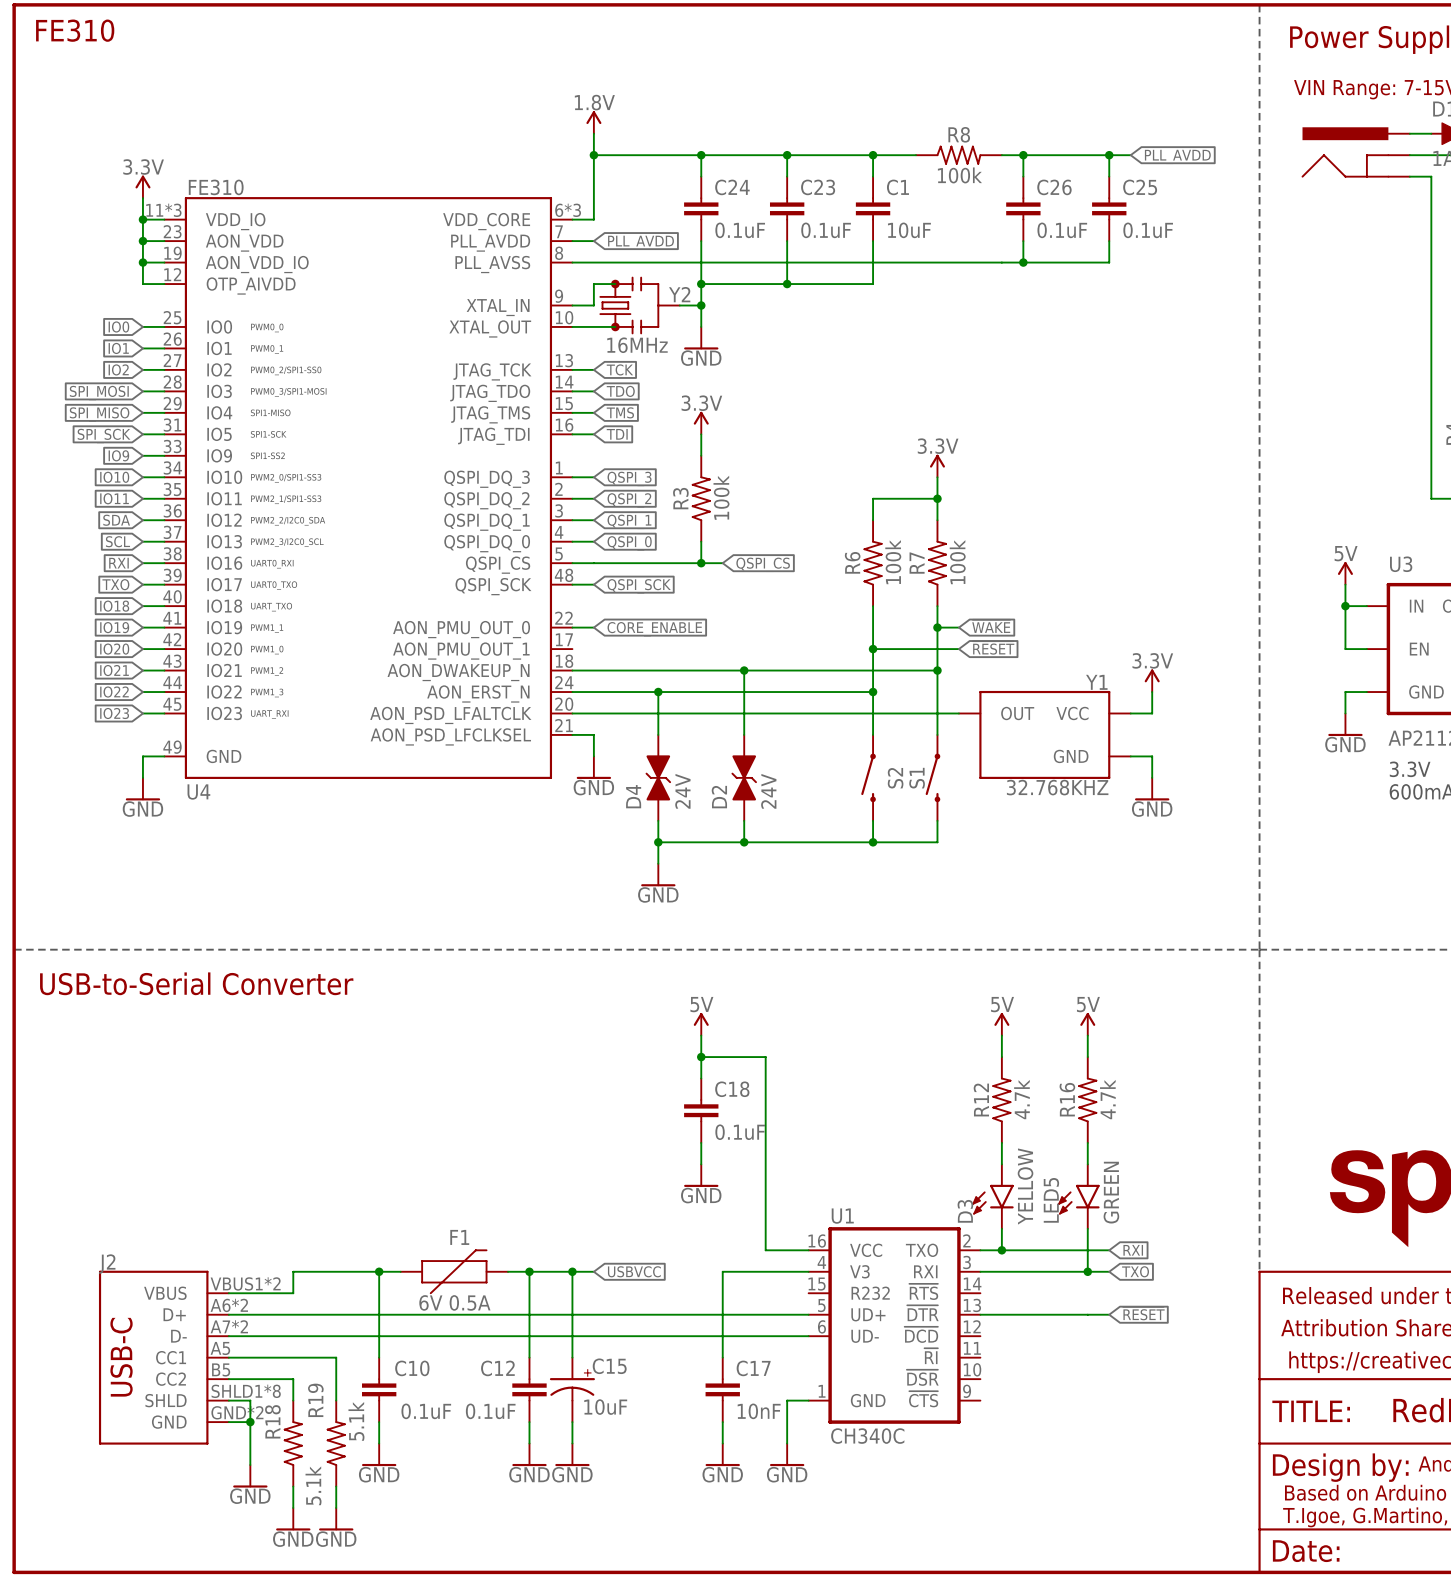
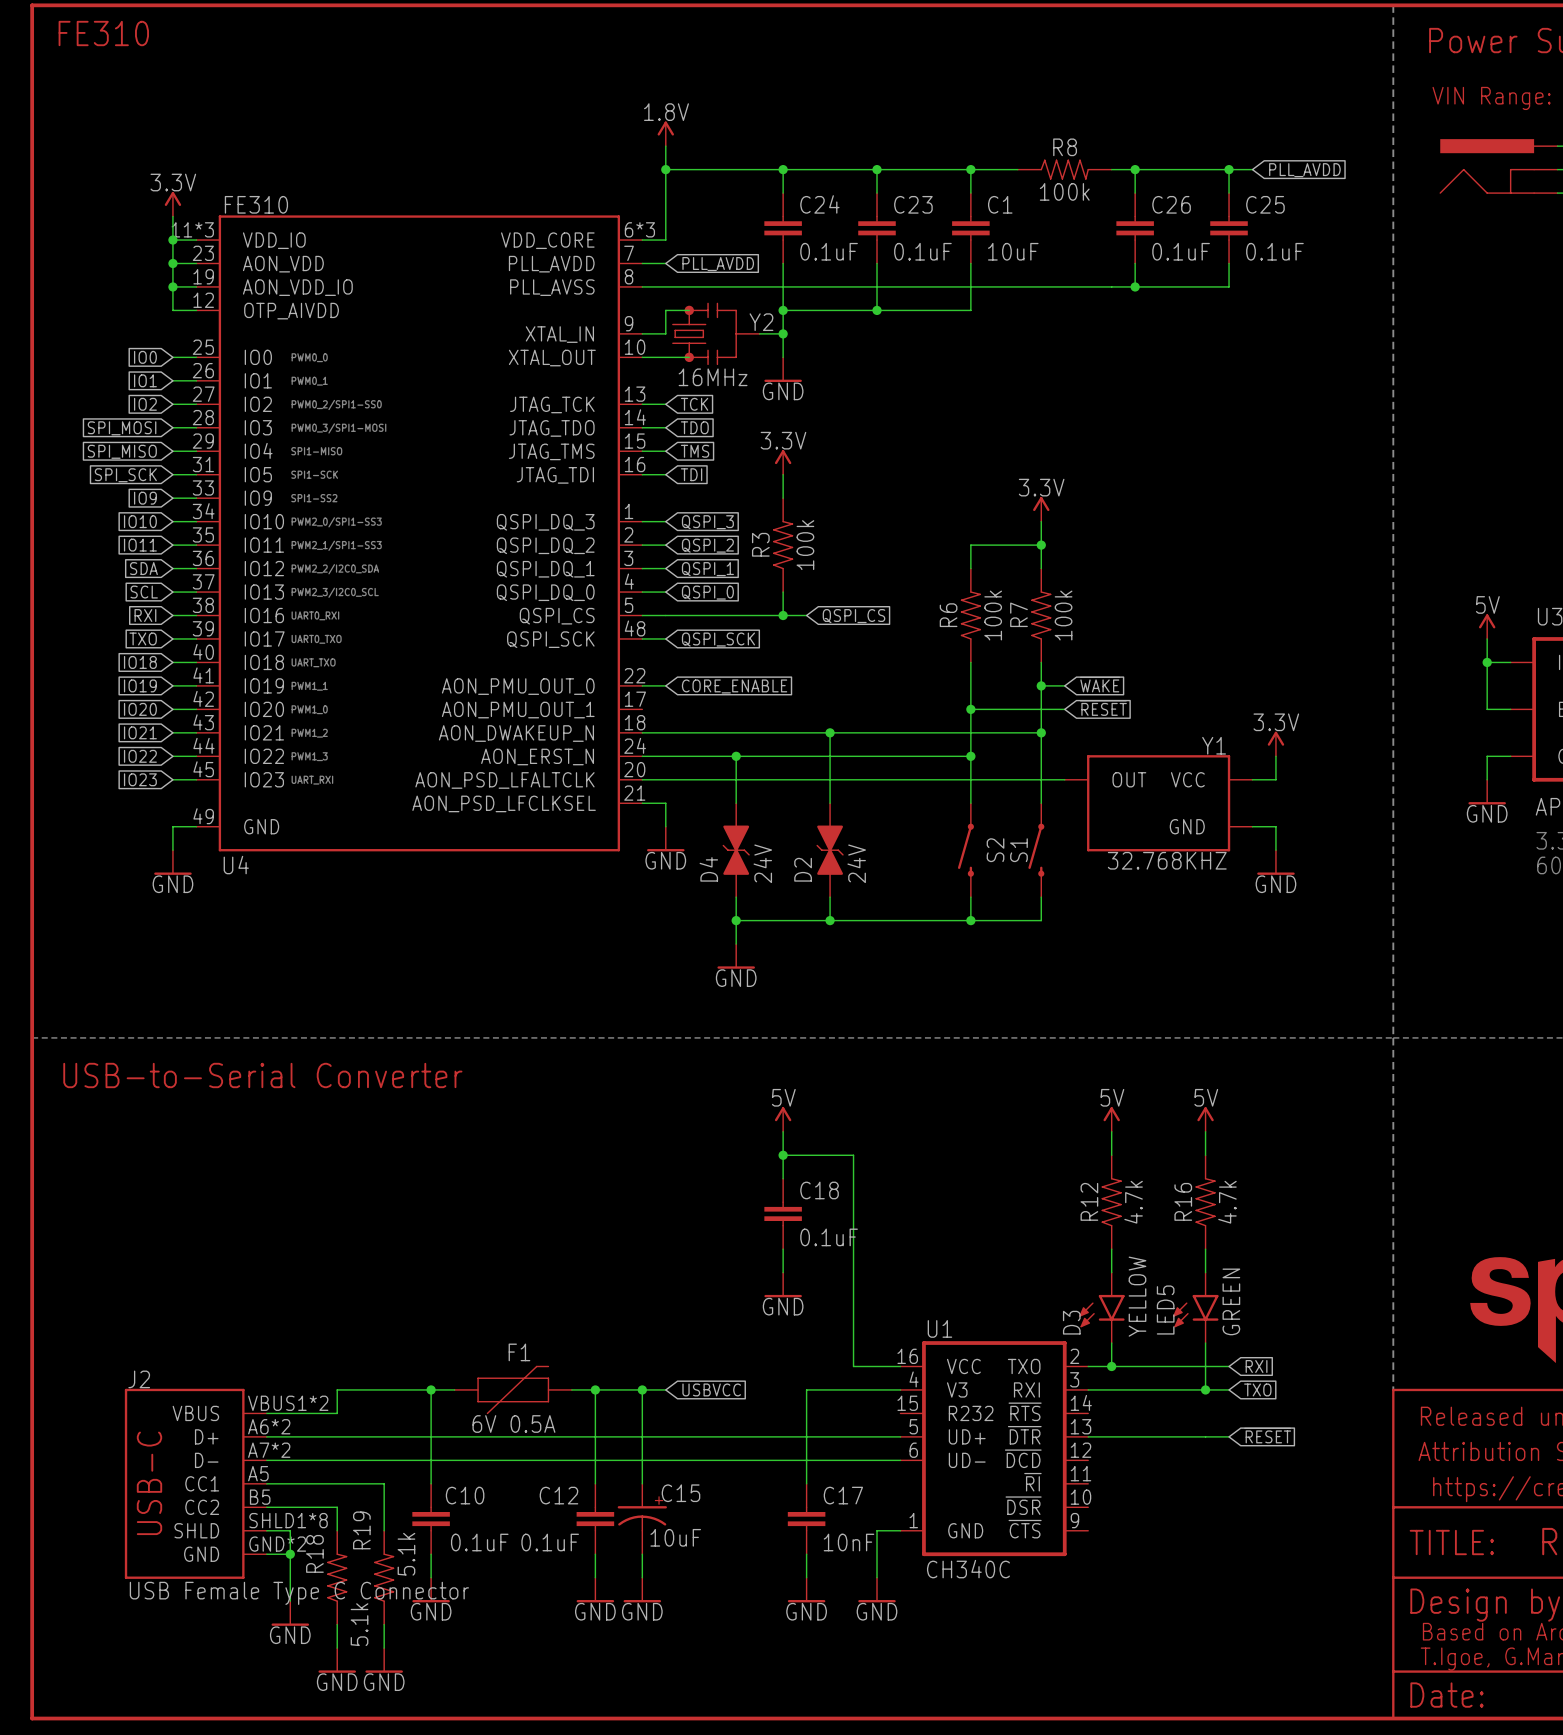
J2 value: none -> USB Female Type C Connector (299, 1593)

